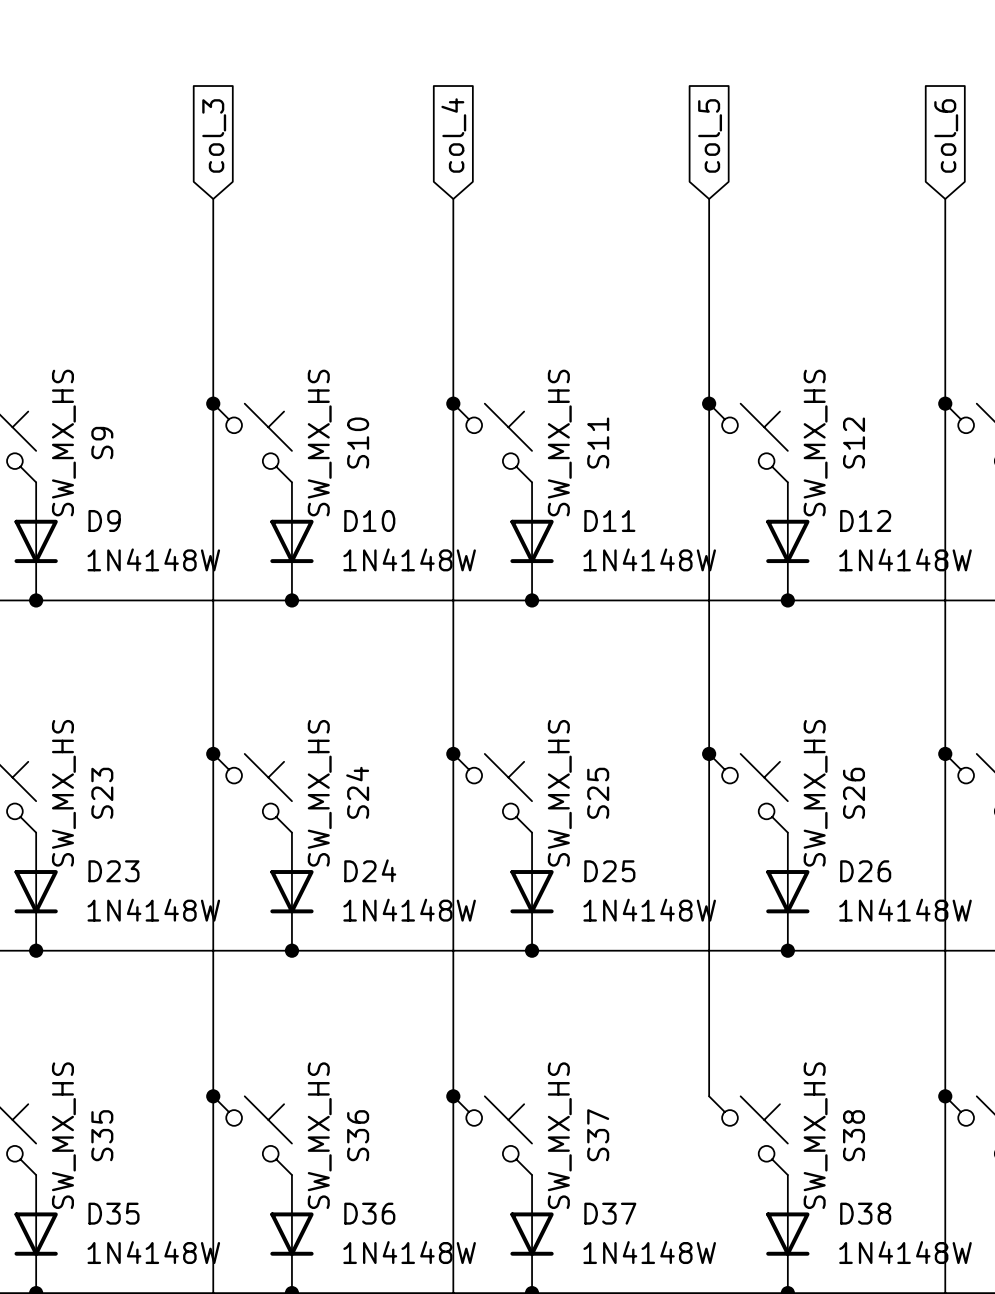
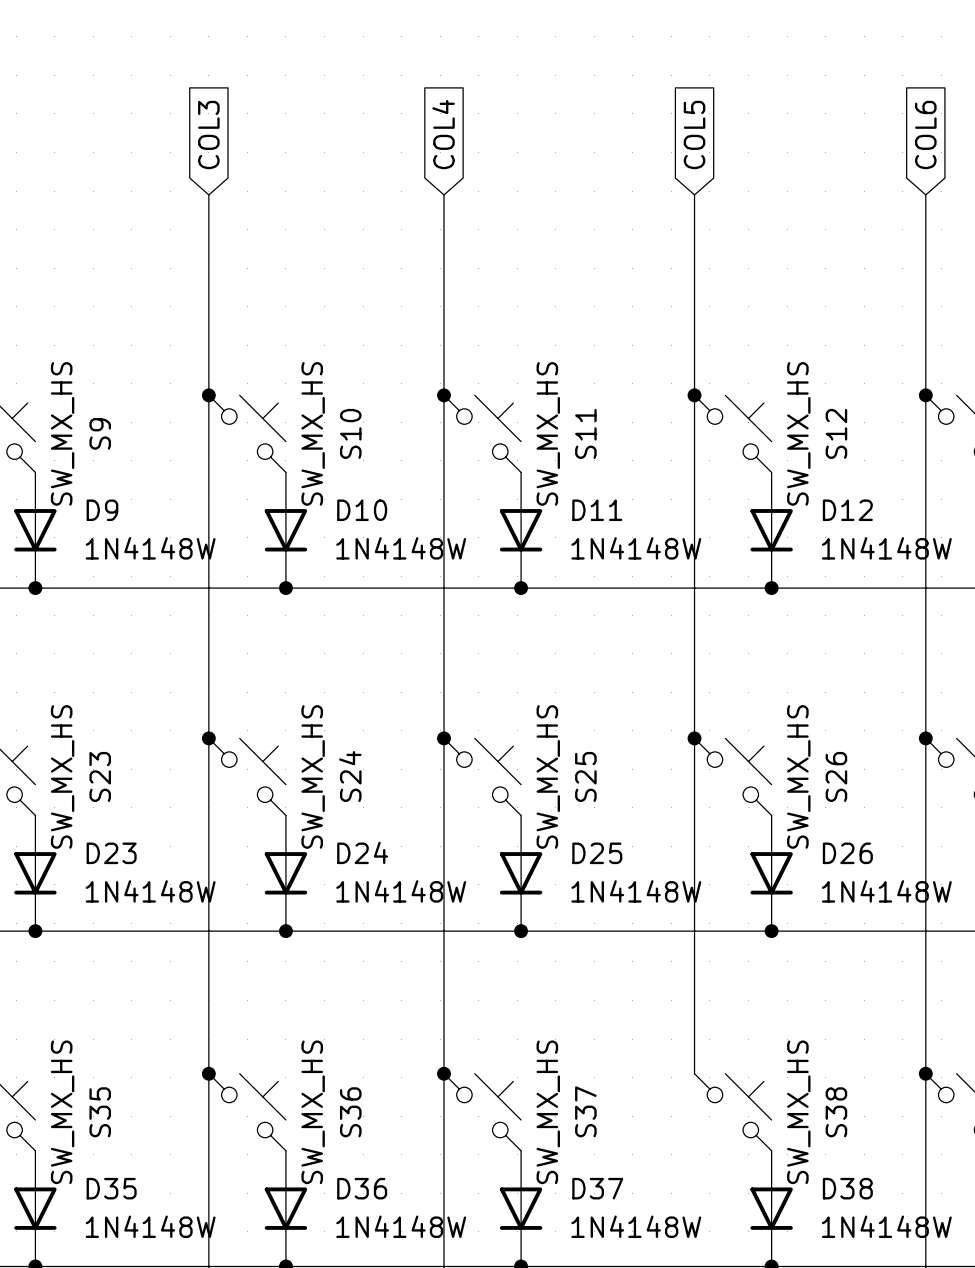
global label: col_3 (214, 135) -> COL3 (208, 135)
global label: col_4 (453, 135) -> COL4 (443, 134)
global label: col_5 (710, 135) -> COL5 (694, 135)
global label: col_6 (946, 135) -> COL6 (925, 135)

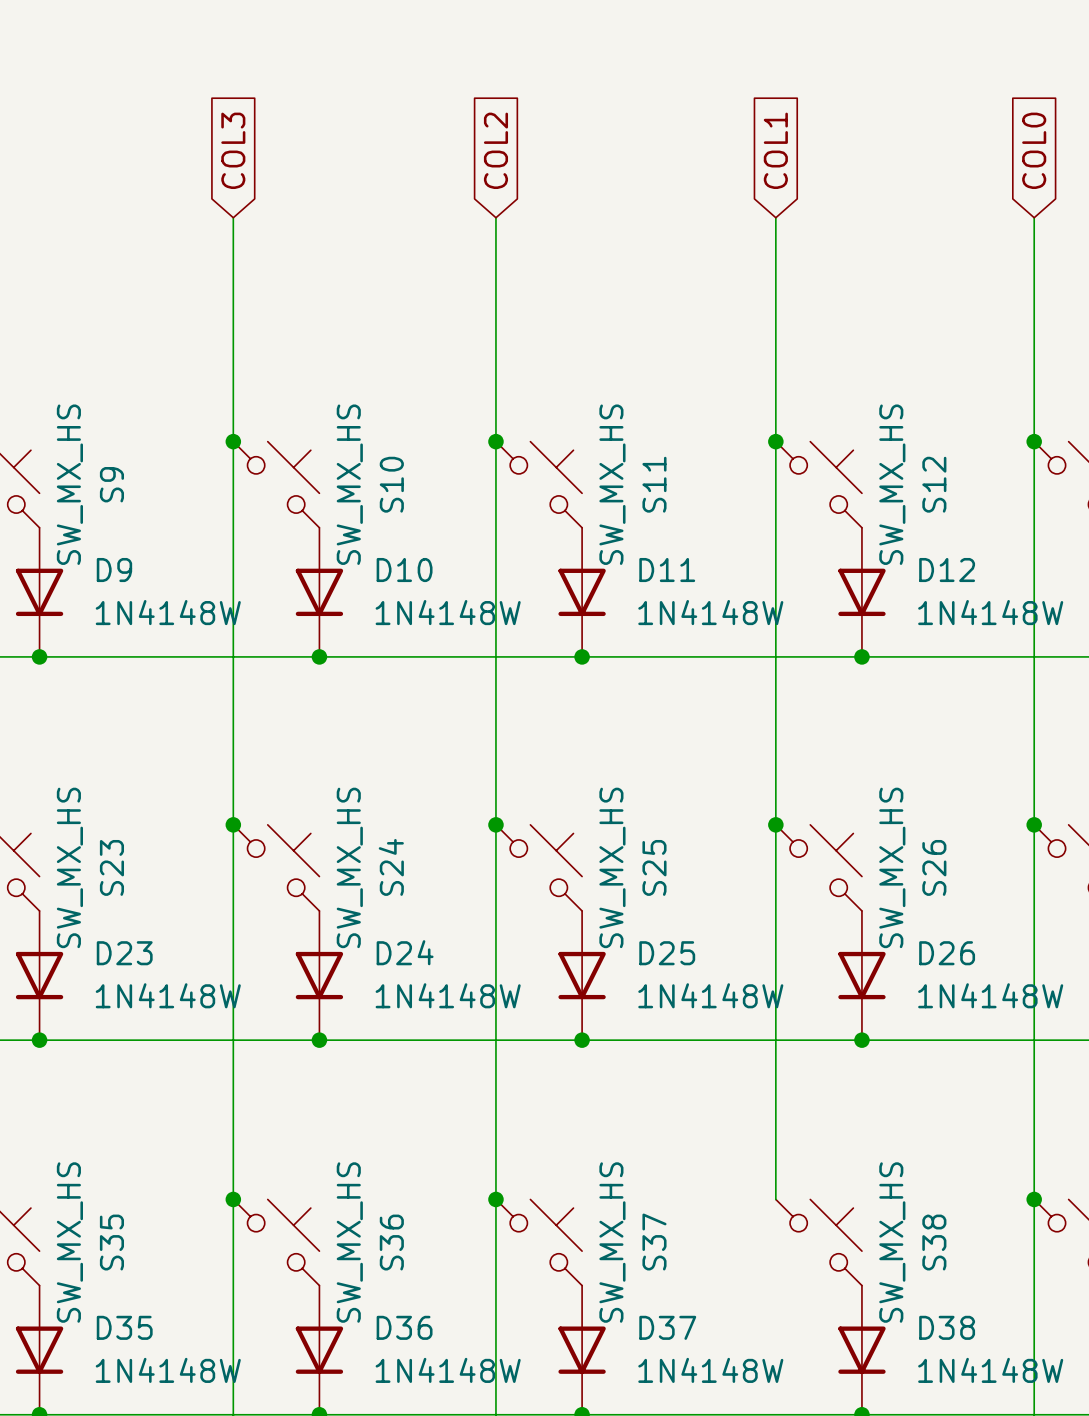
global label: COL4 (443, 134) -> COL2 (495, 150)
global label: COL5 (694, 135) -> COL1 (775, 150)
global label: COL6 (925, 135) -> COL0 (1034, 150)

